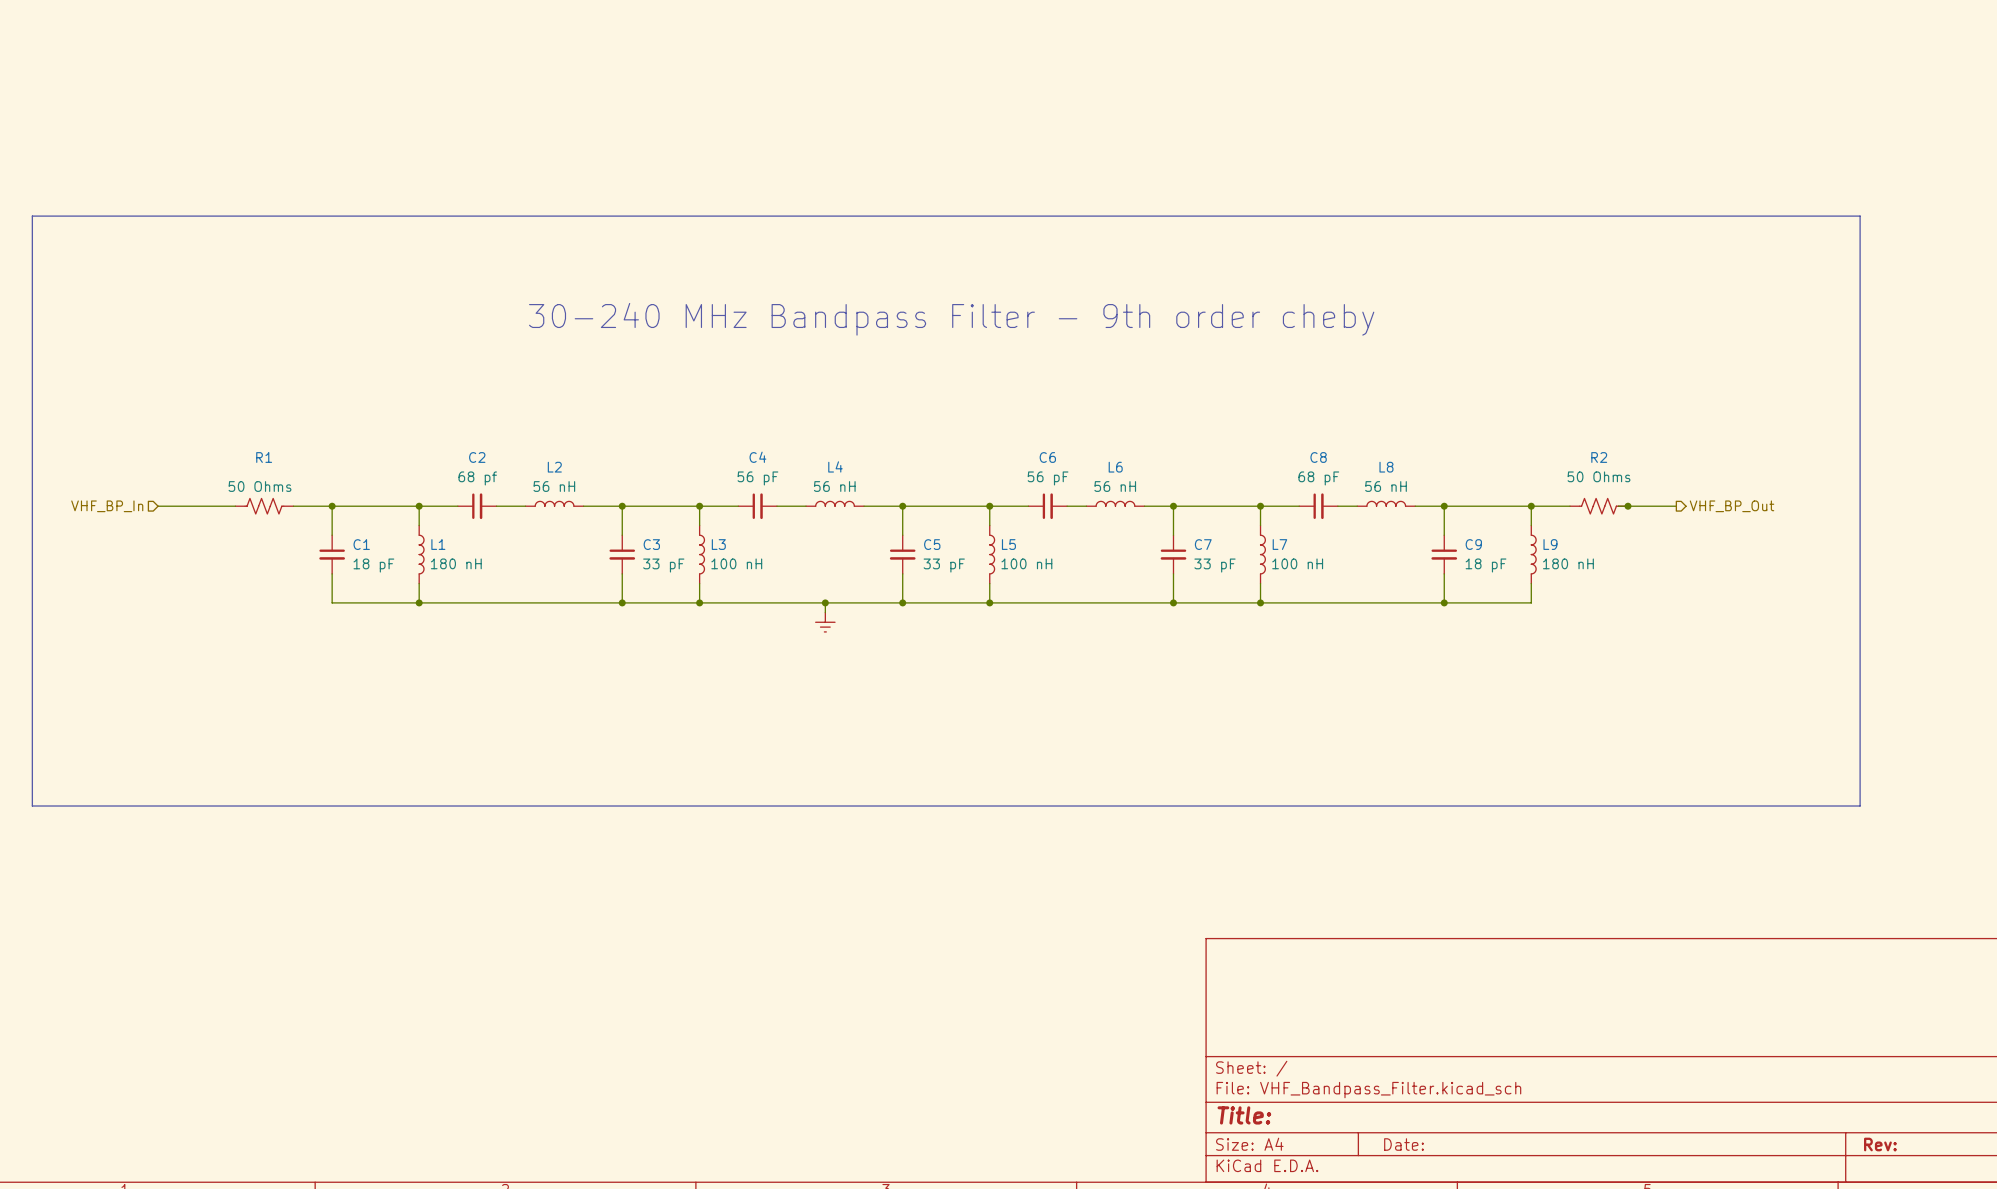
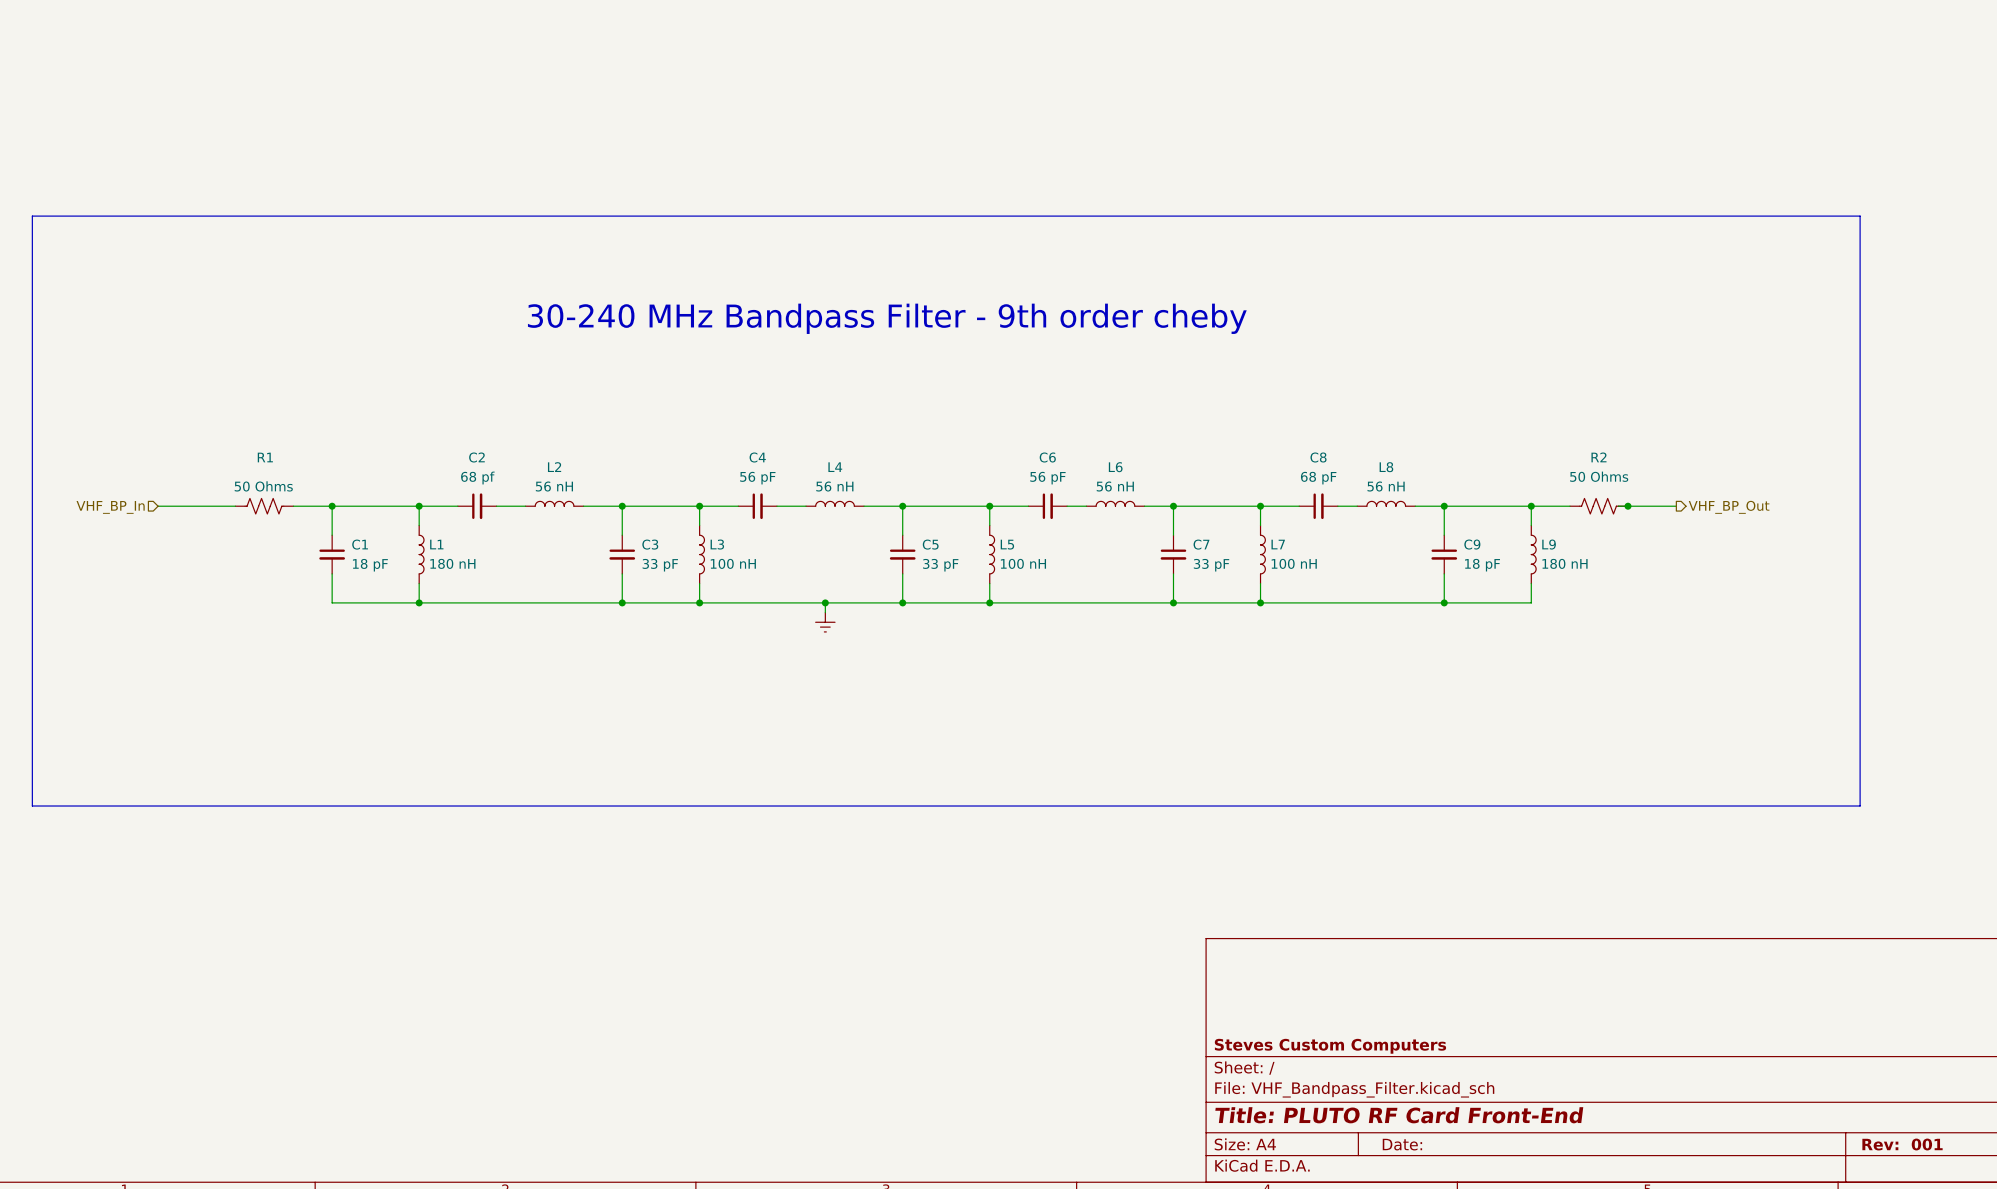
title block: none -> Steves Custom Computers (1330, 1046)
title block: Title: (1244, 1115) -> Title: PLUTO RF Card Front-End (1399, 1115)
title block: Rev: (1880, 1144) -> Rev: 001 (1902, 1144)

